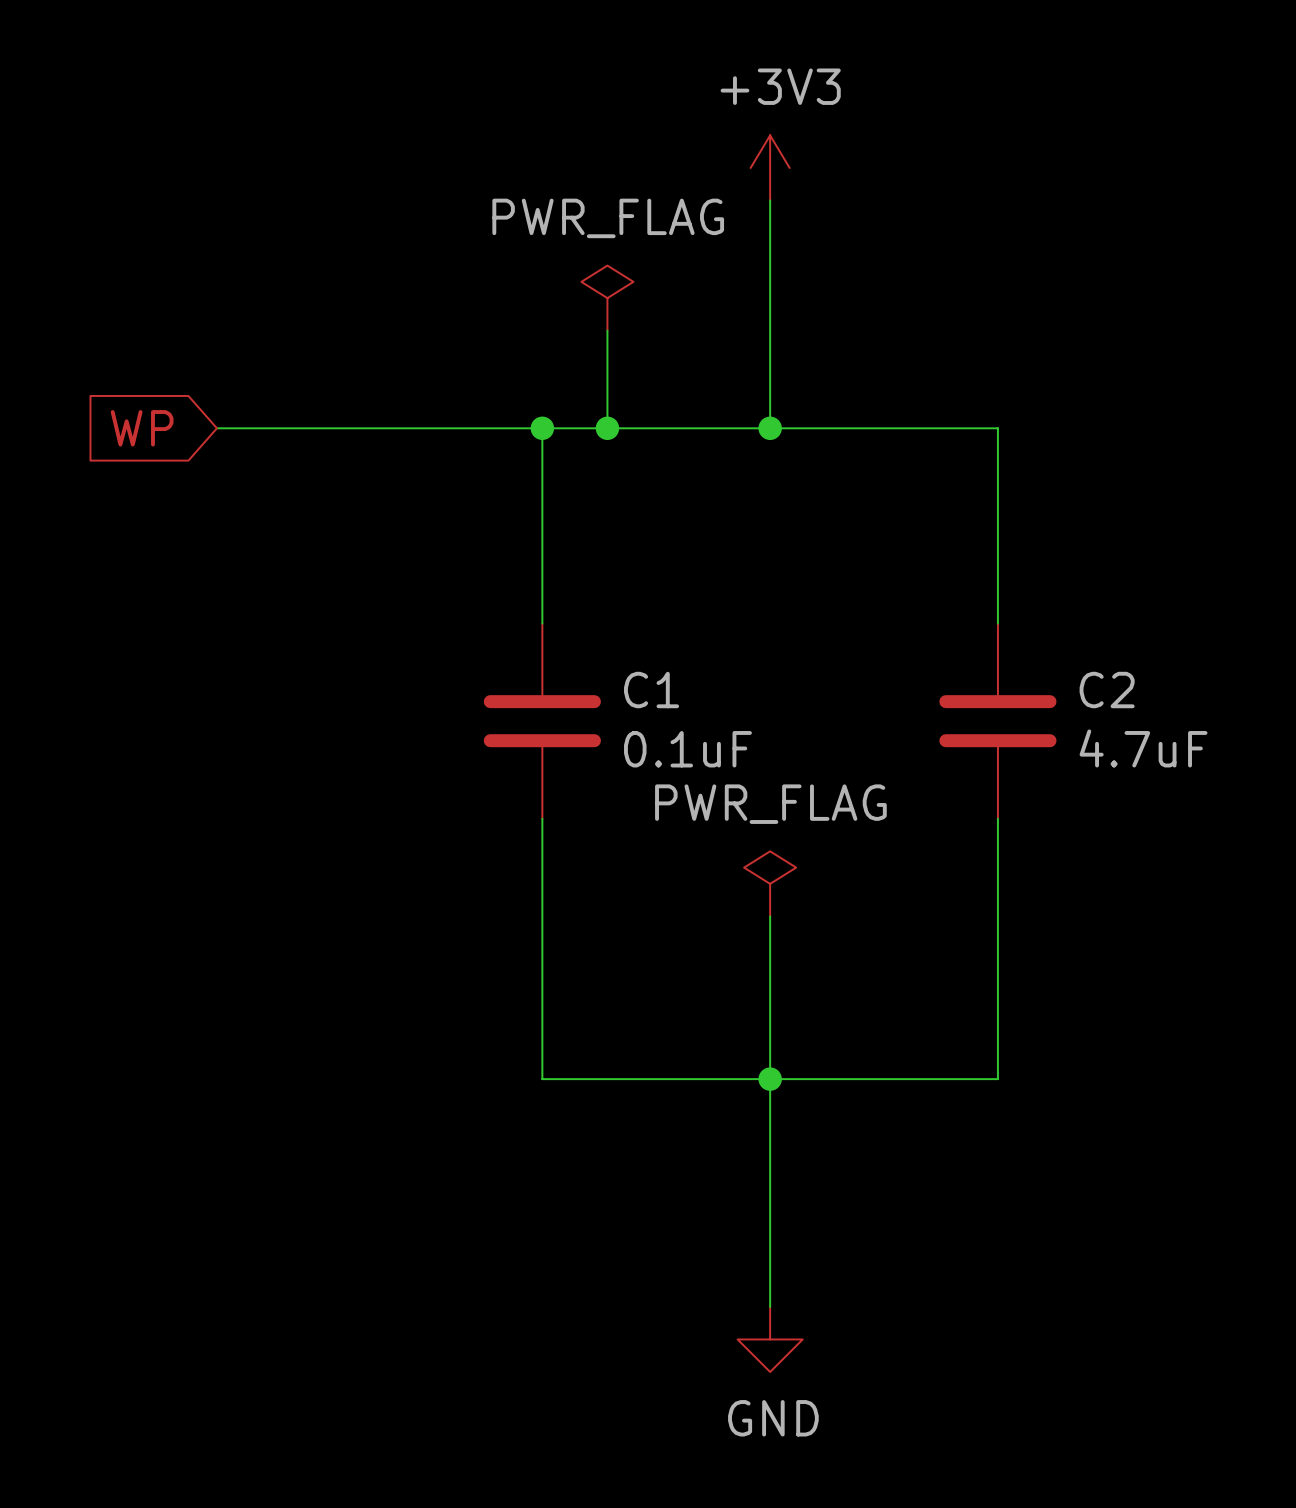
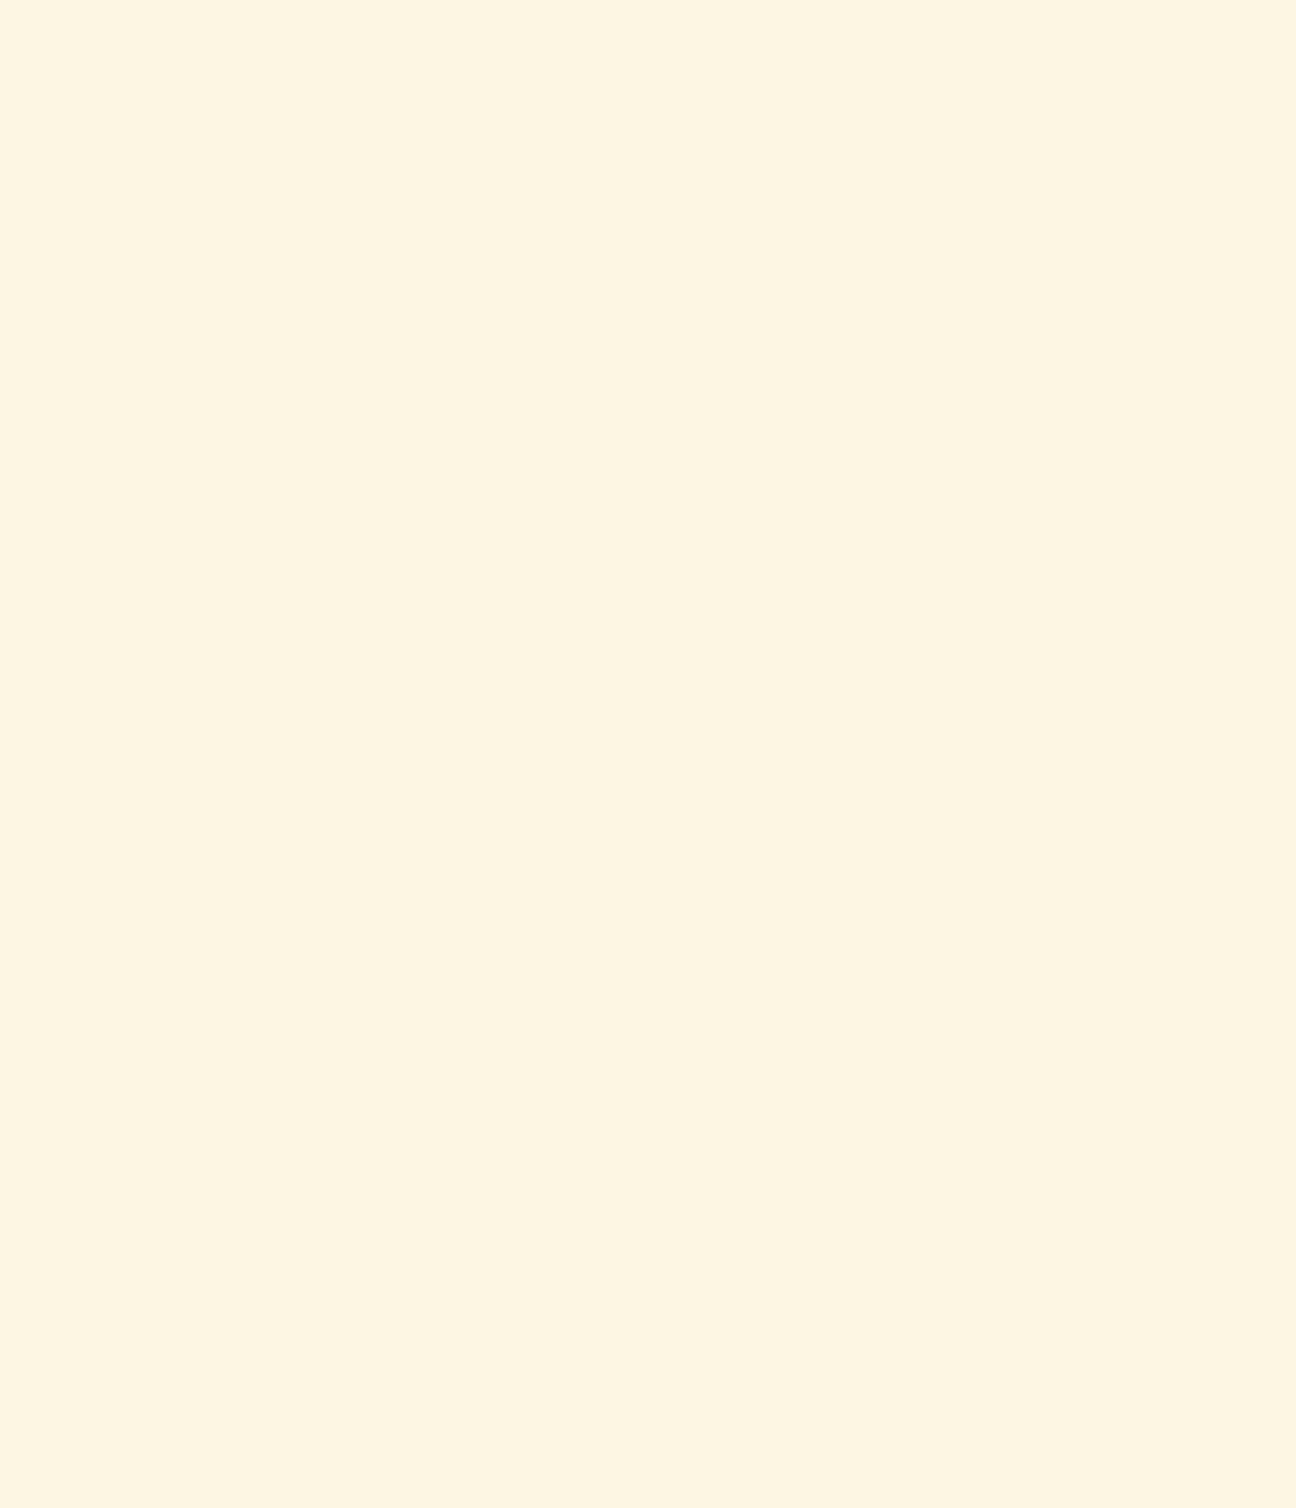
power symbol: +3V3 (770, 167) -> none
wire: (770, 200) (770, 428) -> none
power symbol: PWR_FLAG (607, 298) -> none
wire: (607, 330) (607, 428) -> none
global label: WP (142, 428) -> none
wire: (216, 428) (997, 428) (997, 623) -> none
wire: (542, 428) (542, 623) -> none
junction: (542, 428) -> none
junction: (607, 428) -> none
junction: (770, 428) -> none
C1: 0.1uF (542, 721) -> none
C2: 4.7uF (997, 721) -> none
wire: (542, 818) (542, 1079) (997, 1079) (997, 818) -> none
power symbol: PWR_FLAG (770, 883) -> none
wire: (770, 916) (770, 1306) -> none
junction: (770, 1079) -> none
power symbol: GND (770, 1339) -> none

